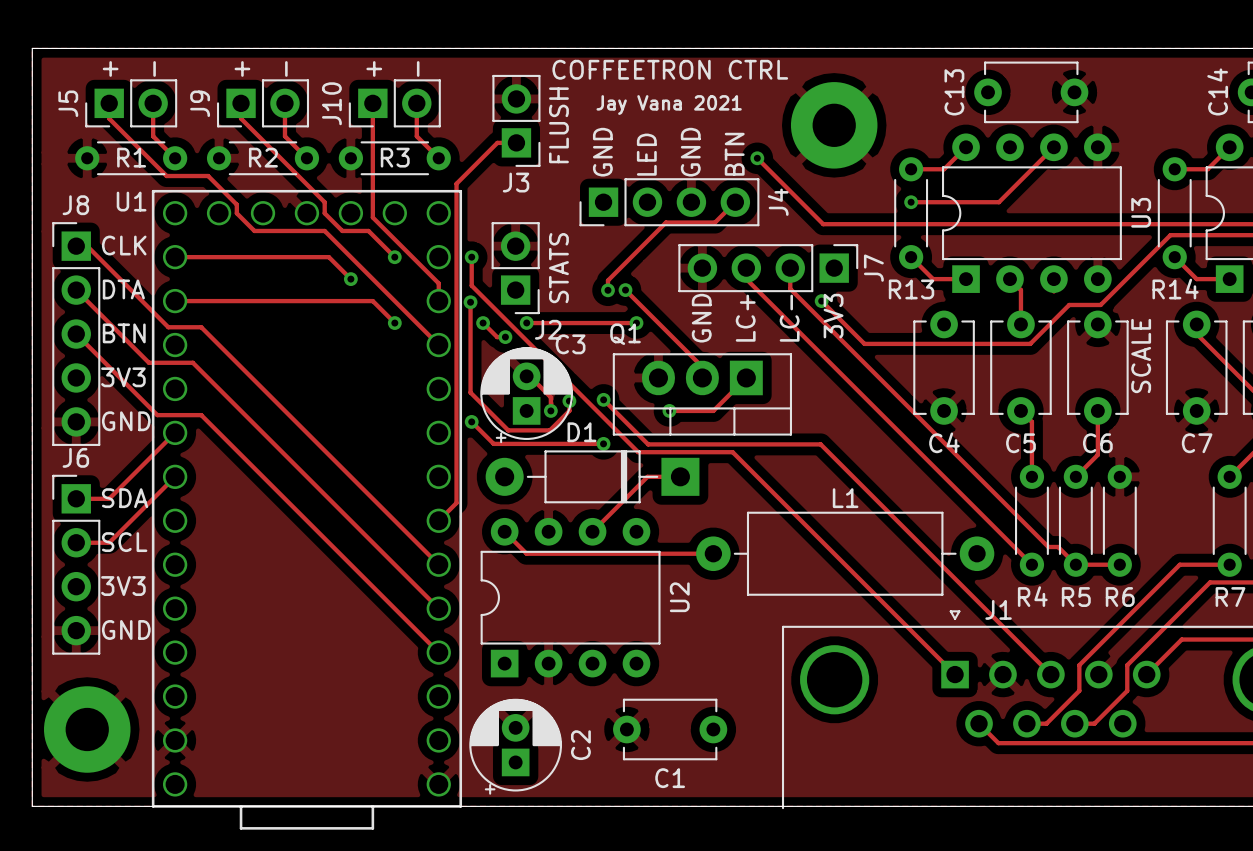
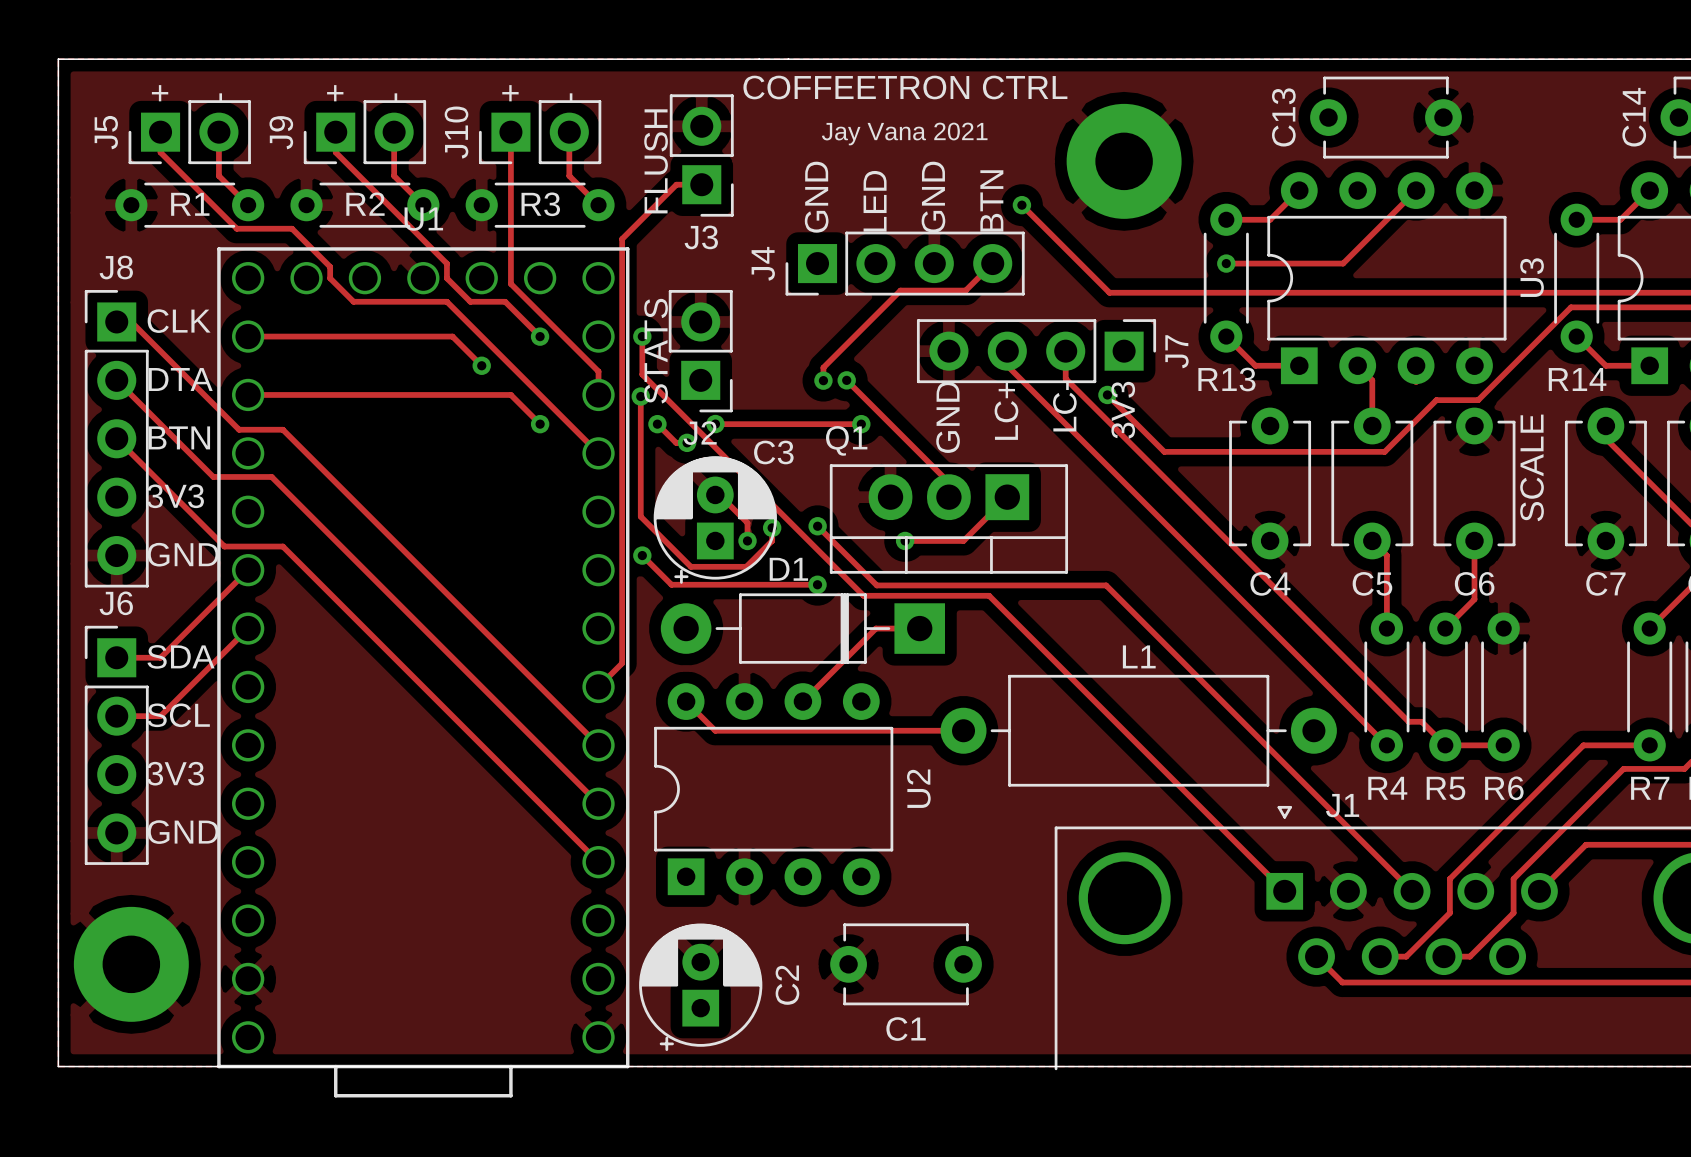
text position: FLUSH (558, 125) -> FLUSH (656, 161)
U1 name position: U1 (131, 201) -> U1 (423, 219)
J4 name position: J4 (778, 202) -> J4 (763, 263)
text position: STATS (558, 268) -> STATS (656, 351)
J2 name position: J2 (548, 329) -> J2 (700, 433)

